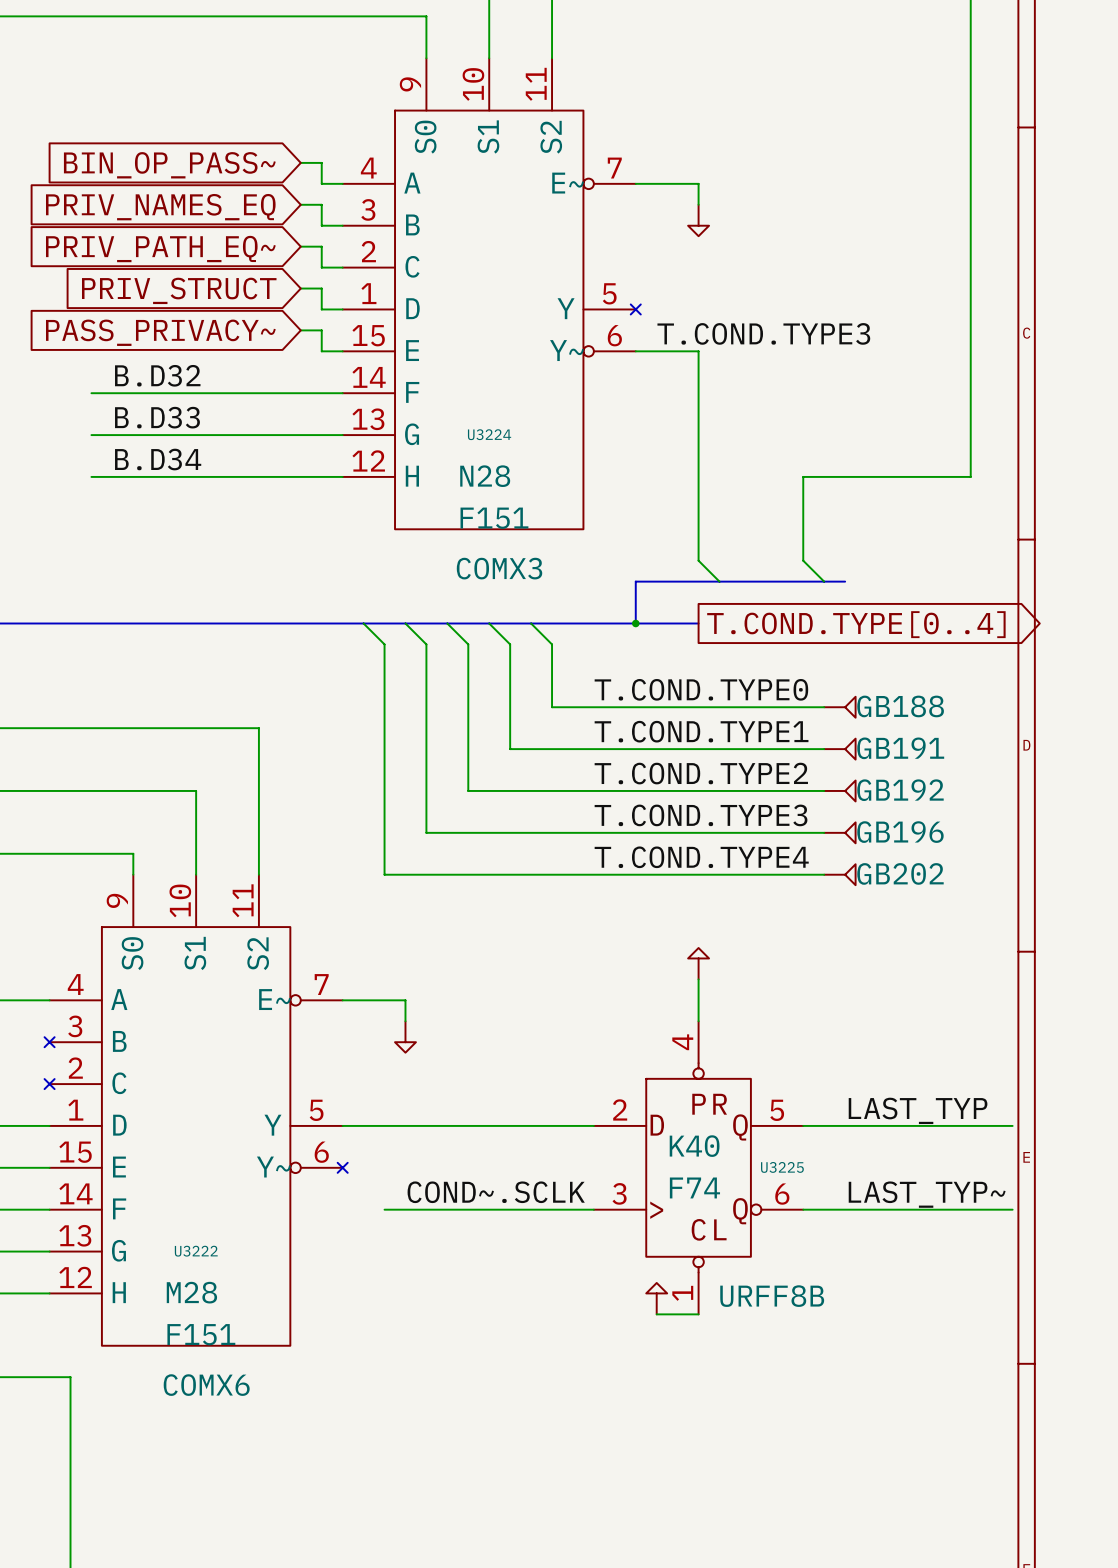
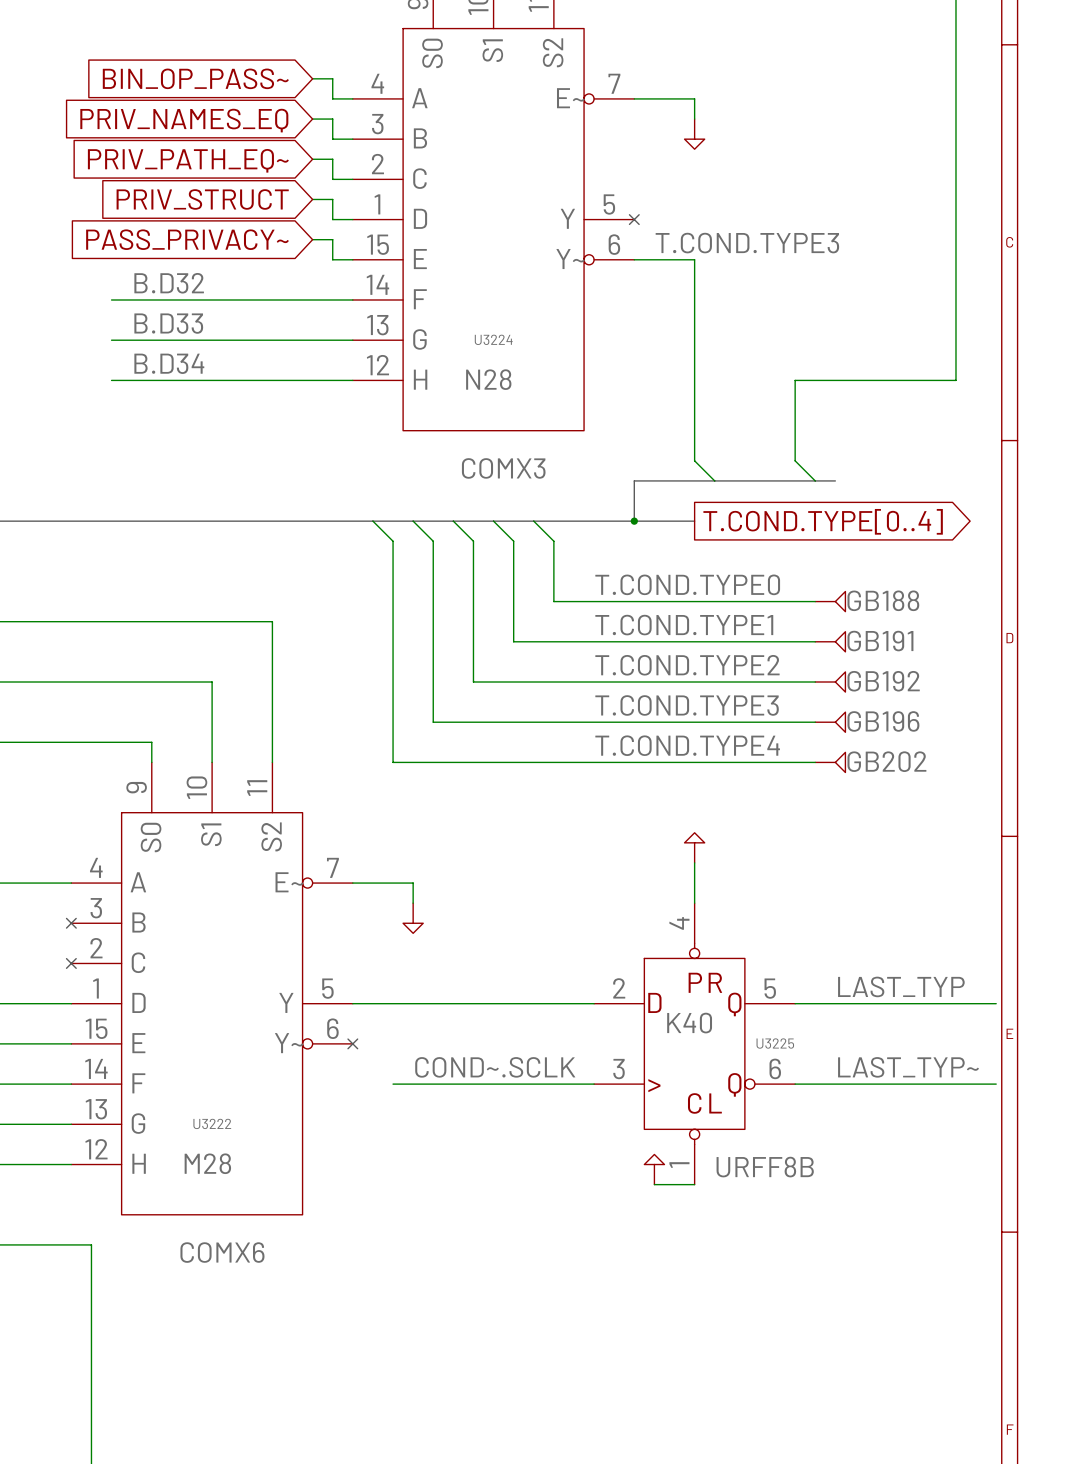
U3224 value: F151 (494, 518) -> none
U3225 value: F74 (694, 1187) -> none
U3222 value: F151 (201, 1334) -> none

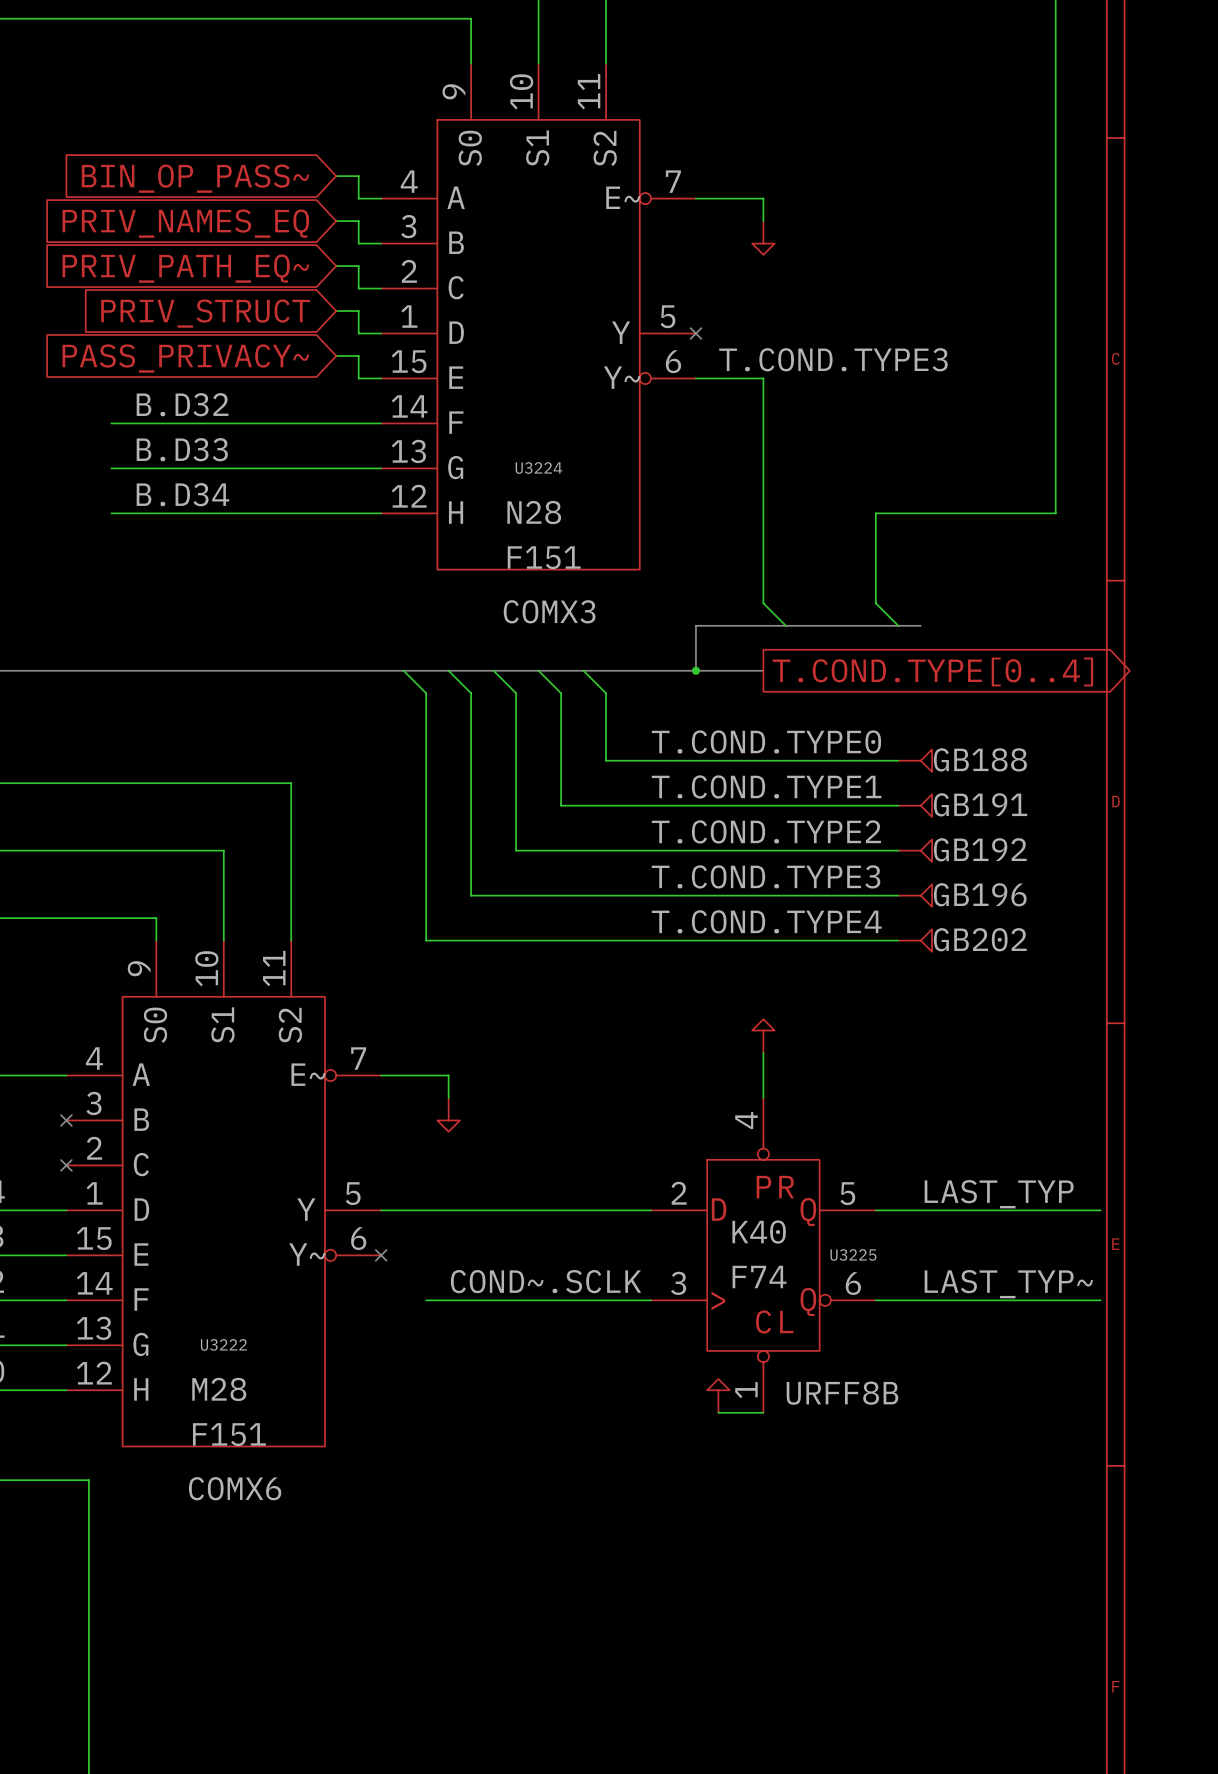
U3224 value: none -> F151 (544, 557)
U3225 value: none -> F74 (759, 1277)
U3222 value: none -> F151 (229, 1434)

